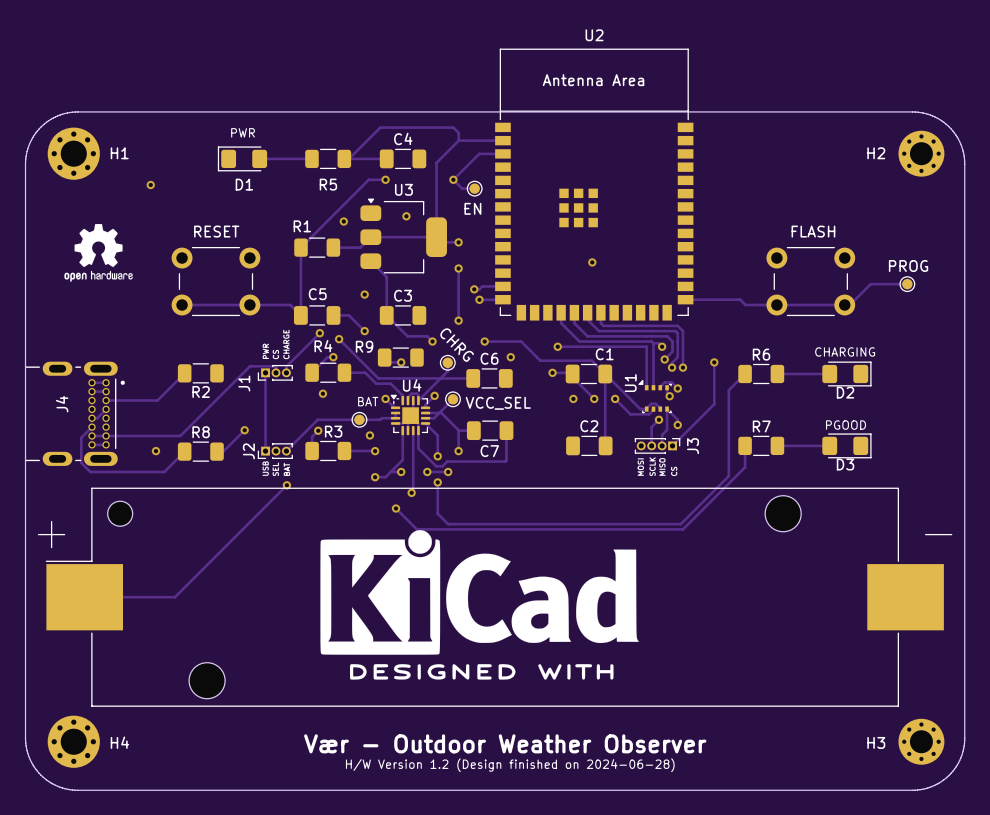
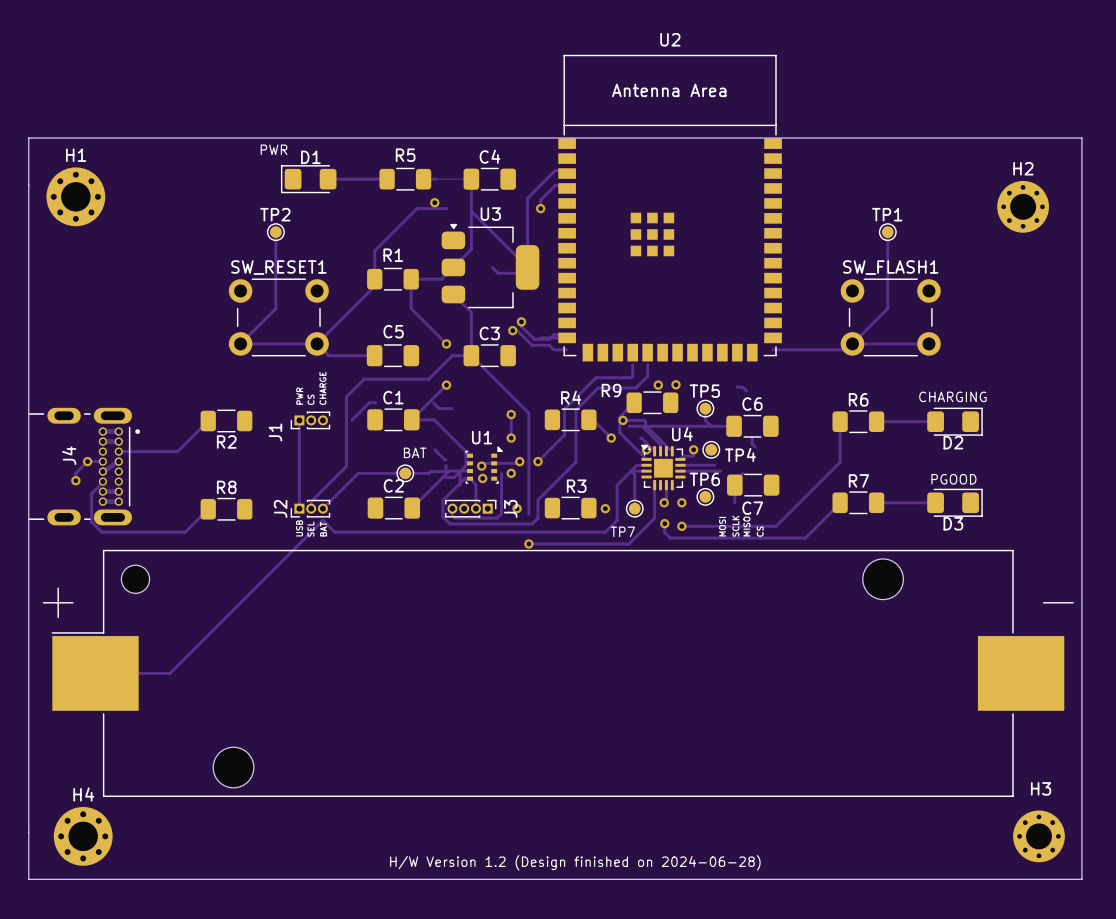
track: (458, 140) (502, 140) -> none
track: (458, 140) (458, 132) (453, 127) (380, 127) (349, 158) -> none
track: (458, 140) (436, 162) (436, 237) (370, 237) (360, 247) (333, 247) -> none
track: none -> (567, 170) (555, 170) (527, 198) (527, 267) (471, 211)
H1 position: (73, 153) -> (75, 196)
H1 name position: H1 (119, 153) -> H1 (76, 155)
track: (502, 153) (479, 153) (453, 179) (462, 188) (474, 188) -> none
H2 name position: H2 (876, 153) -> H2 (1023, 168)
H2 position: (921, 153) -> (1023, 206)
D1 position: (242, 158) -> (308, 179)
track: (259, 158) (290, 158) -> none
R5 position: (328, 158) -> (405, 179)
track: (344, 158) (375, 158) -> (351, 179) (387, 179)
track: none -> (436, 179) (471, 179) (471, 249) (441, 279) (411, 279) (411, 308) (446, 343)
C4 position: (403, 158) -> (489, 179)
board edge: (25, 164) (29, 144) (40, 127) (57, 115) (77, 111) (915, 112) (935, 117) (951, 129) (961, 146) (964, 164) (964, 740) (962, 753) (957, 764) (949, 774) (939, 782) (925, 788) (912, 790) (75, 790) (55, 785) (39, 773) (28, 755) (25, 738) -> (28, 185) (28, 137) (1081, 137) (1081, 879) (28, 879) (28, 832)
track: none -> (567, 185) (555, 185) (540, 200) (540, 208)
track: (385, 179) (368, 179) (300, 247) (300, 315) (290, 305) (281, 305) -> none
via position: (453, 179) -> (540, 208)
via: (150, 184) -> none
D1 name position: D1 (244, 184) -> D1 (310, 157)
R5 name position: R5 (328, 184) -> R5 (405, 155)
track: none -> (446, 208) (417, 208) (374, 250) (374, 286) (317, 343) (328, 355) (374, 355)
EN: (474, 188) -> none
TP2: none -> (275, 232)
track: none -> (887, 232) (887, 308) (846, 349) (773, 349)
TP1: none -> (887, 232)
via: (406, 216) -> none
via: (343, 221) -> none
drawing: [64, 224, 133, 282] -> none
R1 name position: R1 (302, 226) -> R1 (393, 255)
U3 position: (403, 235) -> (490, 266)
via: (458, 242) -> none
R1 position: (317, 247) -> (392, 279)
track: (370, 261) (386, 277) (386, 315) (407, 336) (427, 336) (432, 341) -> none
track: none -> (453, 294) (471, 312) (471, 355)
via: (592, 262) -> none
track: (458, 268) (458, 320) -> none
via: (458, 268) -> none
RESET: (215, 281) -> none
SW_RESET1: none -> (278, 317)
SW_FLASH1: none -> (890, 317)
FLASH: (810, 281) -> none
track: (907, 284) (870, 284) (849, 305) (823, 305) -> none
PROG: (907, 284) -> none
track: none -> (521, 321) (521, 326) (534, 339) (549, 339) (553, 334) (567, 334)
via: none -> (521, 321)
track: (502, 286) (482, 286) (479, 289) (474, 289) -> none
via: (474, 289) -> none
track: none -> (512, 330) (517, 330) (531, 345) (549, 345) (553, 349) (567, 349)
via: none -> (512, 330)
via: (364, 294) -> none
via: (479, 299) -> none
track: (685, 299) (740, 299) (745, 305) (756, 305) -> none
track: (182, 305) (213, 305) -> (275, 232) (275, 308) (240, 343)
via: none -> (446, 343)
track: (561, 312) (561, 323) (579, 341) (651, 341) (653, 343) (653, 387) -> none
track: (574, 312) (574, 323) (587, 336) (667, 336) (672, 341) (672, 351) (664, 359) -> none
track: (587, 312) (587, 319) (598, 331) (675, 331) (677, 333) (677, 357) (672, 362) (672, 367) -> none
track: (600, 312) (600, 323) (603, 325) (677, 325) (682, 331) (682, 367) -> none
C5 position: (317, 315) -> (392, 355)
track: (333, 315) (349, 315) (364, 331) -> none
C3 position: (403, 315) -> (489, 355)
track: none -> (471, 355) (528, 413) (528, 514)
track: none -> (471, 355) (452, 355) (428, 379) (364, 379) (346, 396) (346, 466) (311, 501) (311, 508)
via: (458, 320) -> none
track: none -> (632, 364) (631, 377) (596, 377) (564, 409) (564, 435) (538, 461)
track: none -> (647, 364) (647, 376) (635, 388) (598, 388) (575, 410) (575, 461) (538, 499) (538, 518) (532, 523) (450, 523) (442, 516) (442, 500) (464, 478) (470, 478) (475, 484) (475, 508)
via: (364, 331) -> none
track: (319, 333) (286, 366) (286, 372) -> none
via: (319, 333) -> none
track: (339, 339) (378, 378) (473, 378) -> none
via: (339, 339) -> none
track: none -> (446, 385) (411, 419) (434, 419) (470, 455)
via: none -> (446, 385)
via: (432, 341) -> none
track: (484, 341) (521, 341) (540, 360) (591, 360) (640, 409) (646, 409) (651, 403) (655, 403) (660, 409) -> none
via: (484, 341) -> none
via: none -> (658, 385)
via: none -> (675, 384)
R4 name position: R4 (323, 346) -> R4 (571, 397)
track: (557, 346) (646, 346) (646, 387) -> none
via: (557, 346) -> none
via: (662, 346) -> none
C1 name position: C1 (604, 354) -> C1 (393, 397)
via: (333, 357) -> none
R9 position: (400, 357) -> (652, 402)
via: (510, 357) -> none
track: none -> (634, 402) (619, 417) (619, 432) (646, 459)
via: (664, 359) -> none
J4 footprint: [25, 361, 125, 466] -> [28, 407, 140, 526]
via: (401, 362) -> none
track: (447, 362) (447, 371) (418, 400) (416, 393) (411, 393) (407, 397) (407, 400) -> none
CHRG: (447, 362) -> none
track: none -> (705, 408) (705, 420) (711, 426)
TP5: none -> (705, 408)
track: (714, 362) (714, 404) (672, 445) -> none
via: (714, 362) -> none
track: (275, 367) (249, 366) (180, 435) (92, 435) -> none
track: none -> (511, 414) (511, 438)
via: none -> (511, 414)
via: (672, 367) -> none
via: (682, 367) -> none
R4 position: (328, 372) -> (570, 419)
track: (344, 372) (365, 372) (376, 383) (390, 383) (402, 395) (402, 400) -> none
track: none -> (588, 419) (593, 419) (611, 438)
C1 position: (588, 373) -> (393, 419)
track: (605, 373) (605, 445) -> none
track: (745, 373) (728, 390) (728, 476) (680, 524) (448, 524) (437, 513) (437, 482) -> (840, 421) (840, 462) (776, 526) (681, 526)
C6 position: (489, 378) -> (752, 426)
track: none -> (628, 426) (734, 426)
track: none -> (642, 426) (660, 444) (660, 451)
U4 name position: U4 (412, 385) -> U4 (682, 434)
track: (660, 387) (664, 382) (671, 382) (677, 388) -> none
via: none -> (511, 438)
via: none -> (611, 438)
track: none -> (640, 438) (654, 451)
via: (677, 388) -> none
via: (322, 393) -> none
track: (434, 395) (425, 404) (425, 407) -> none
via: (434, 395) -> none
U1 rotation: 0° (654, 396) -> 90° clockwise (484, 465)
U1 position: (654, 396) -> (484, 465)
via: (669, 396) -> none
via: (385, 398) -> none
via: (594, 398) -> none
track: (615, 398) (630, 414) (649, 414) (653, 409) -> none
TP4: none -> (711, 449)
track: (453, 399) (434, 418) (425, 418) -> none
VCC_SEL: (453, 399) -> none
track: none -> (693, 456) (683, 456) (680, 459)
via: none -> (87, 461)
track: none -> (102, 461) (87, 461) (75, 473) (75, 480)
track: (106, 409) (97, 418) (92, 418) -> none
track: none -> (519, 461) (518, 463) (484, 463) (481, 466)
via: none -> (519, 461)
via: none -> (538, 461)
track: none -> (646, 465) (636, 465) (617, 485) (617, 520) (605, 532) (505, 532)
track: none -> (680, 465) (714, 465)
track: (425, 413) (441, 413) (459, 430) -> none
via: none -> (481, 466)
U4 position: (410, 414) -> (663, 467)
track: (410, 415) (418, 423) (418, 448) (436, 466) (442, 466) (447, 461) (505, 461) (506, 430) -> none
track: none -> (470, 471) (449, 471) (412, 508)
track: none -> (646, 471) (631, 471) (634, 474) (634, 508)
track: none -> (680, 471) (720, 471)
track: none -> (501, 473) (501, 513) (497, 518) (454, 518) (452, 515) (452, 508)
via: none -> (511, 473)
via: (658, 419) -> none
track: (425, 423) (437, 435) (437, 456) -> none
via: none -> (482, 478)
track: (677, 425) (677, 419) (667, 409) (667, 429) (662, 434) (662, 445) -> none
via: (677, 425) -> none
via: none -> (75, 480)
track: (244, 430) (223, 451) (217, 451) -> none
via: (244, 430) -> none
track: (318, 430) (312, 436) (312, 450) -> none
via: (318, 430) -> none
track: (402, 430) (402, 459) (385, 477) (375, 477) -> none
track: (413, 430) (413, 491) (411, 492) -> none
track: (459, 430) (473, 430) -> none
track: (459, 430) (458, 451) -> none
C7 position: (490, 430) -> (753, 485)
track: none -> (654, 485) (654, 518) (628, 543) (528, 543)
track: none -> (666, 485) (666, 500) (664, 502)
via: (369, 435) -> none
TP6: none -> (705, 496)
C2 position: (589, 445) -> (393, 508)
via: none -> (664, 502)
via: none -> (681, 502)
J3 position: (657, 445) -> (470, 508)
track: (745, 446) (745, 467) (682, 529) (416, 529) (395, 508) -> (840, 503) (805, 538) (670, 538) (664, 532) (664, 523)
R3 position: (328, 450) -> (570, 508)
track: (344, 450) (374, 450) -> none
via: (155, 451) -> none
via: (375, 451) -> none
via: none -> (605, 508)
TP7: none -> (634, 508)
via: (437, 456) -> none
via: none -> (664, 523)
via: none -> (681, 526)
track: none -> (452, 532) (481, 532)
via: (401, 471) -> none
via: (427, 471) -> none
via: (448, 471) -> none
via: (375, 477) -> none
via: (437, 482) -> none
via: none -> (528, 543)
track: (286, 485) (174, 597) (150, 597) -> (440, 532) (334, 532) (322, 520) (169, 673)
via: (286, 485) -> none
via: (411, 492) -> none
via: (395, 508) -> none
drawing: [320, 530, 639, 680] -> none
H4 name position: H4 (119, 742) -> H4 (83, 794)
H3 name position: H3 (876, 742) -> H3 (1041, 788)
text: Vær - Outdoor Weather Observer (505, 743) -> none

